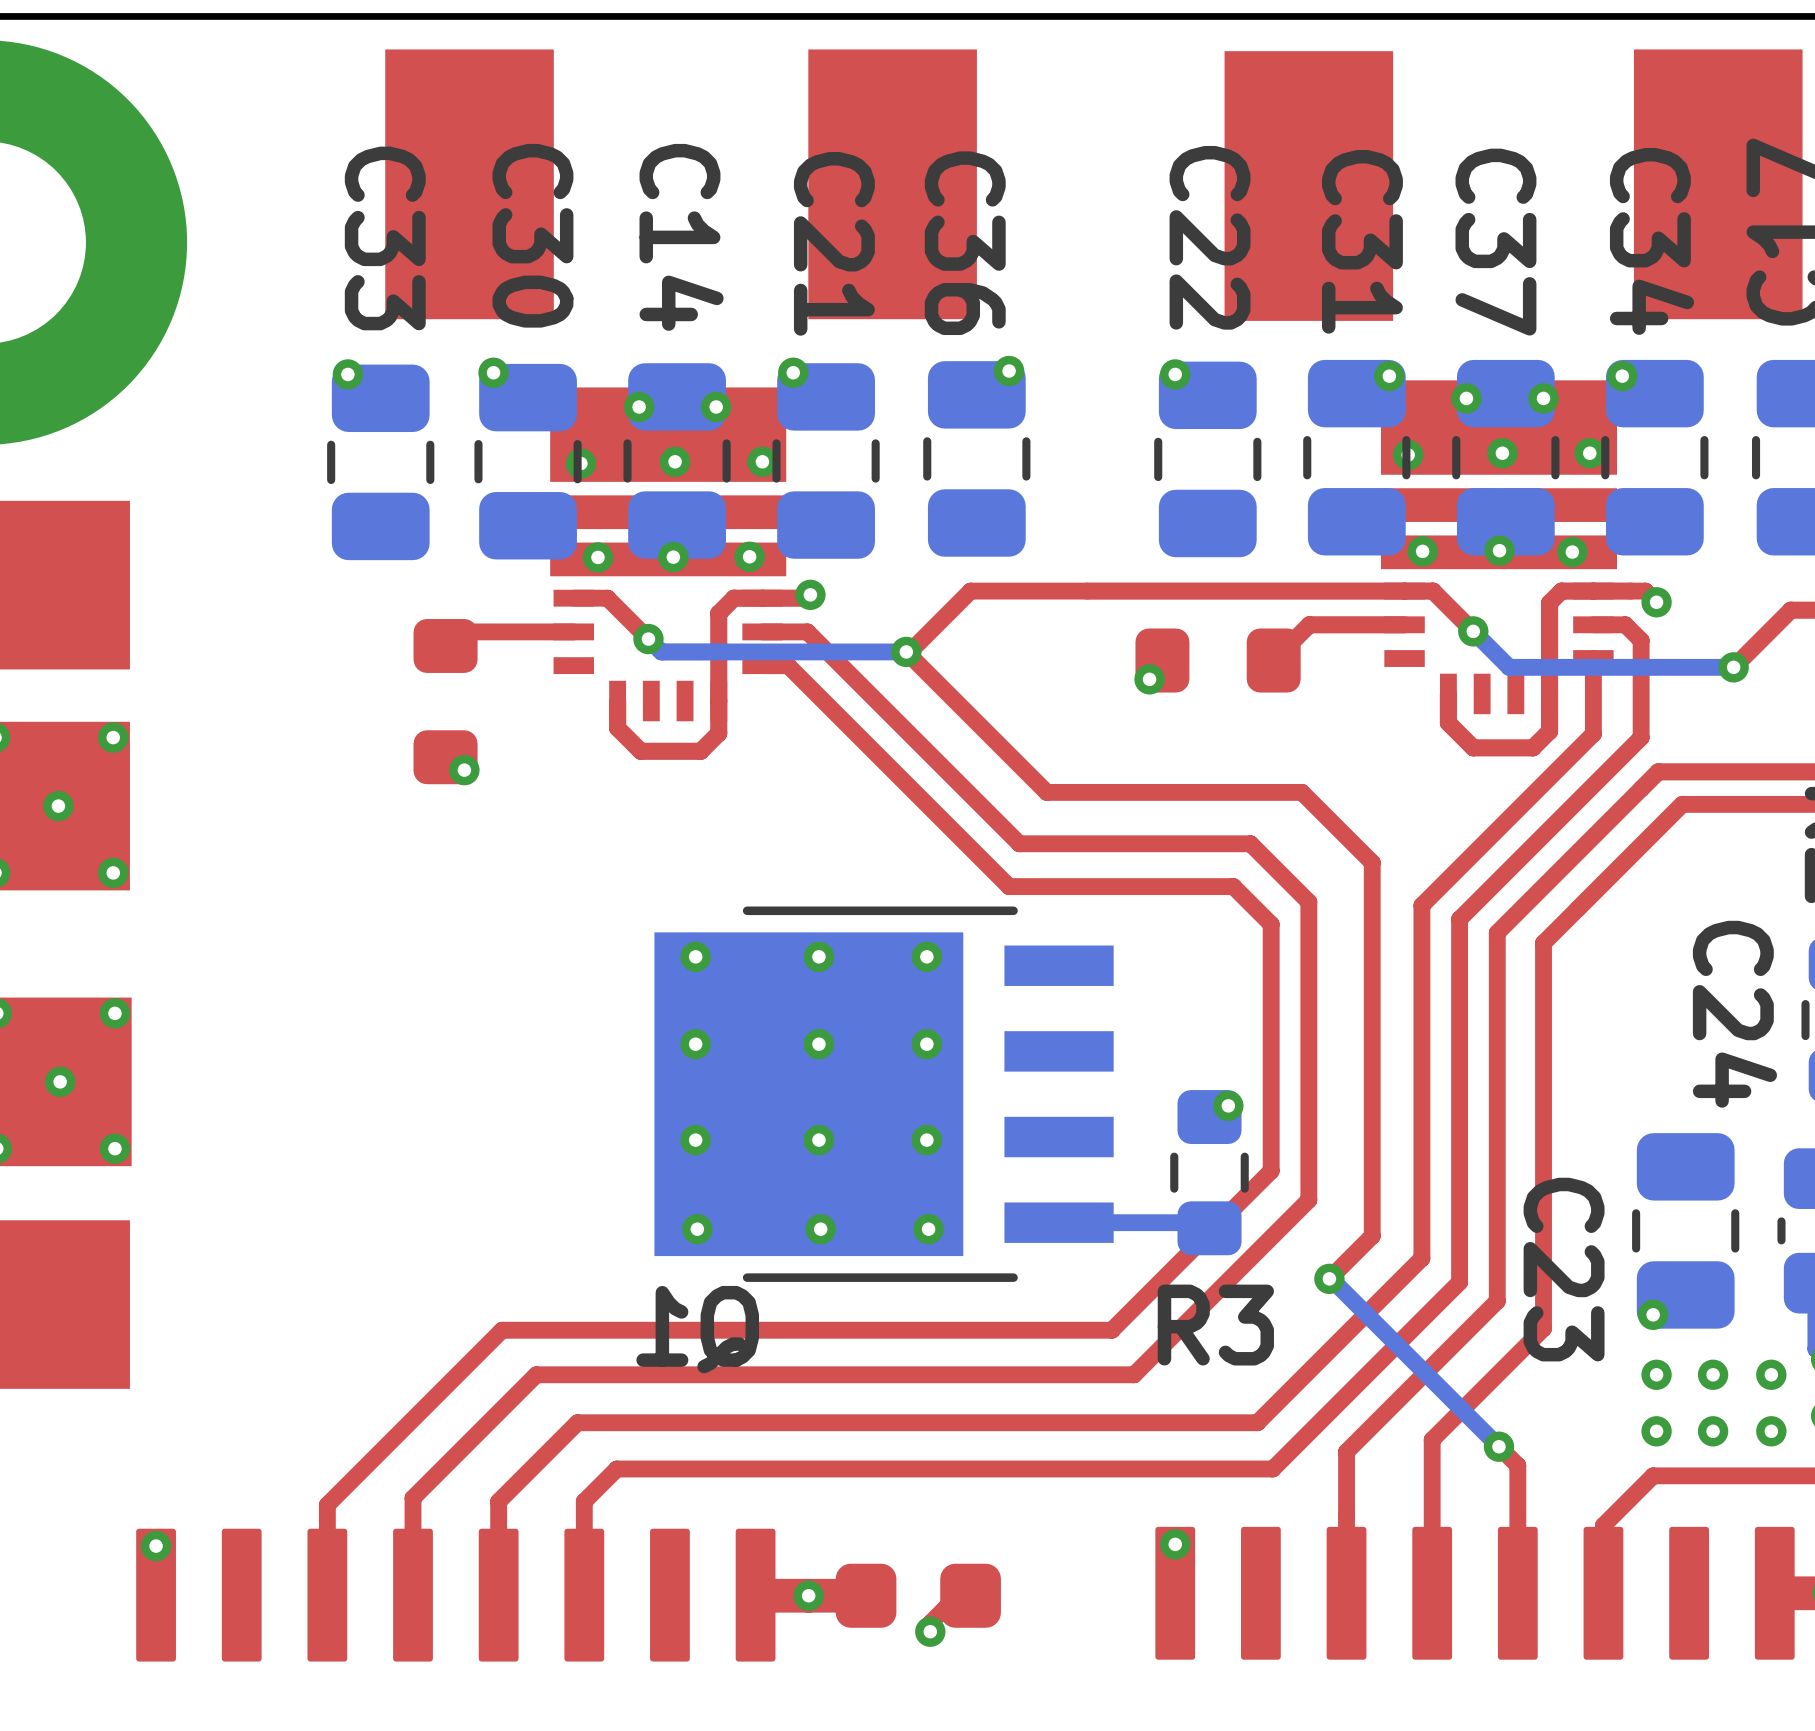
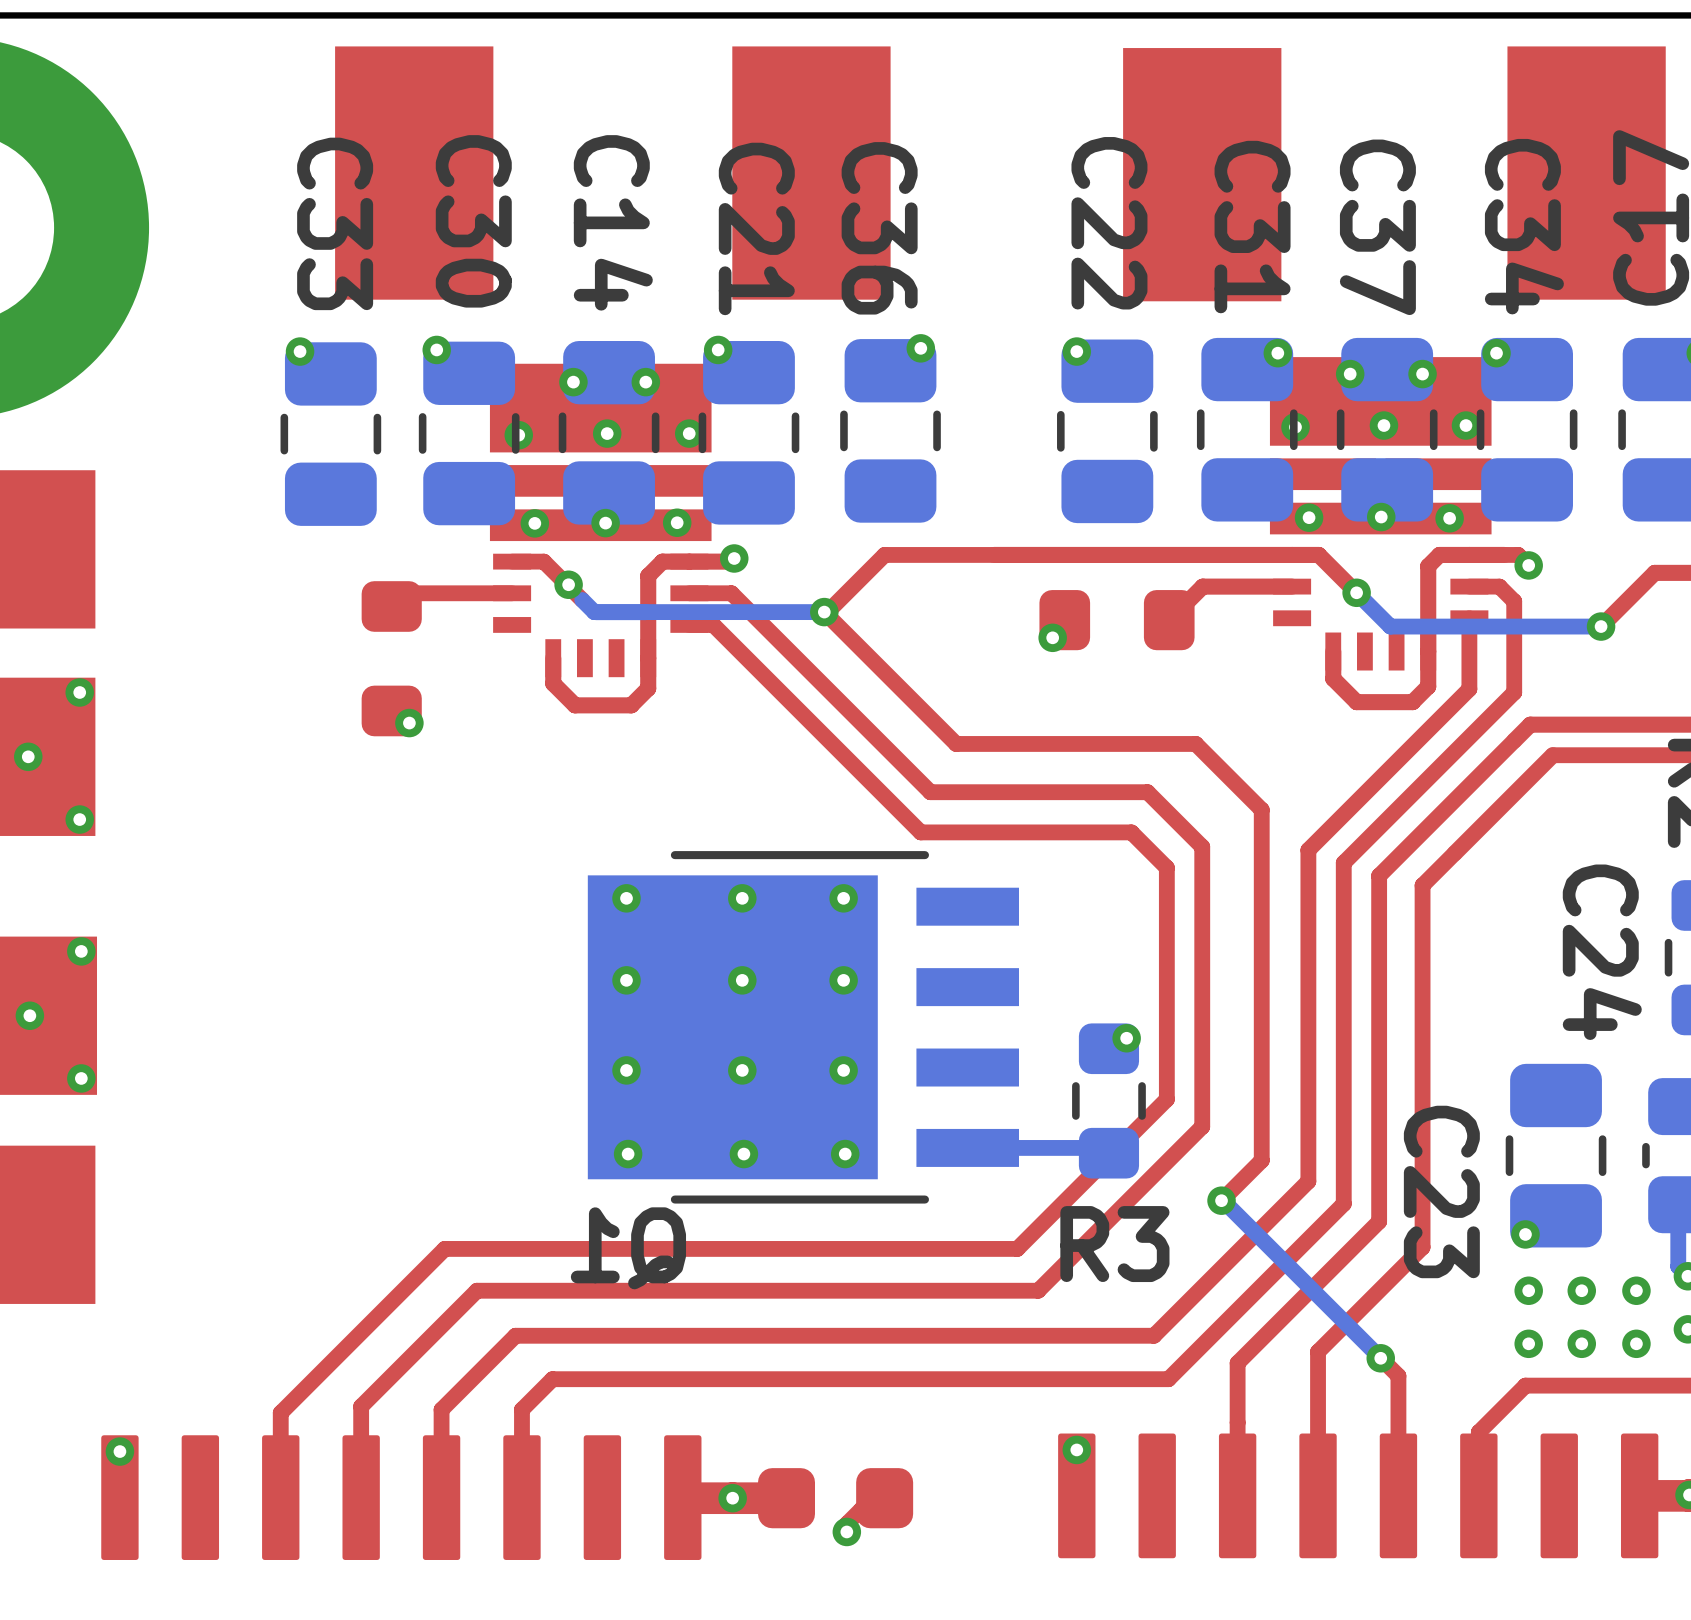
via position: (648, 639) -> (568, 584)

